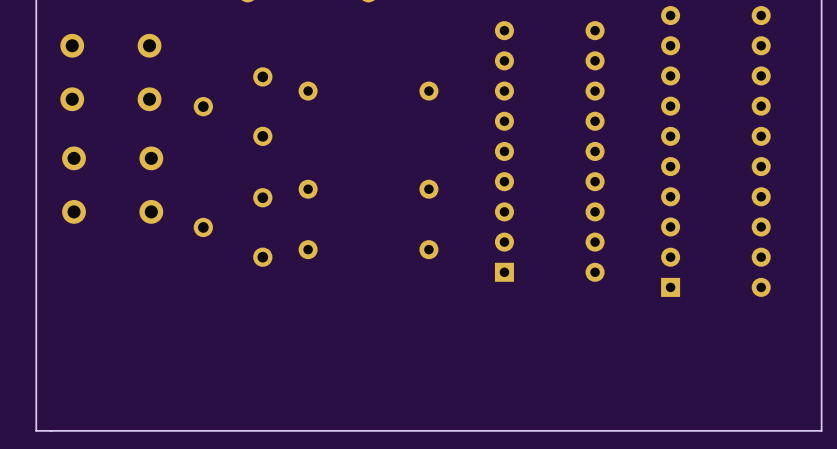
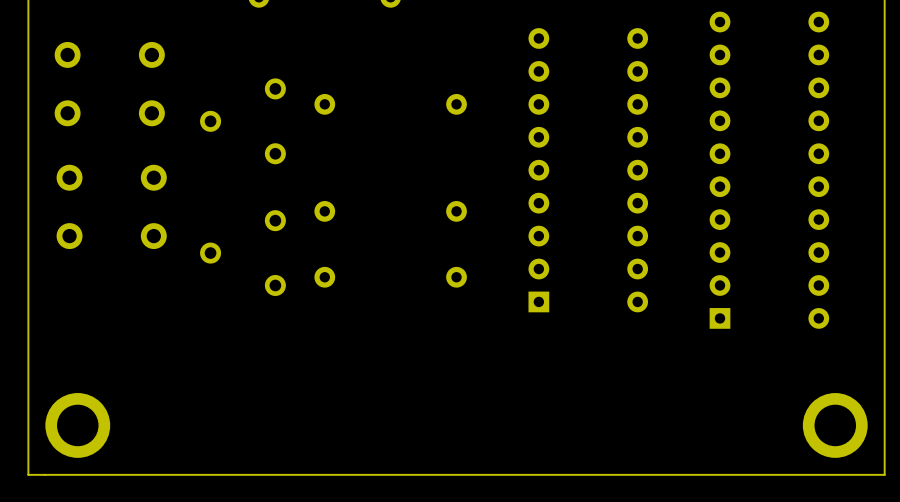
part: none -> (77, 425)
part: none -> (835, 425)

